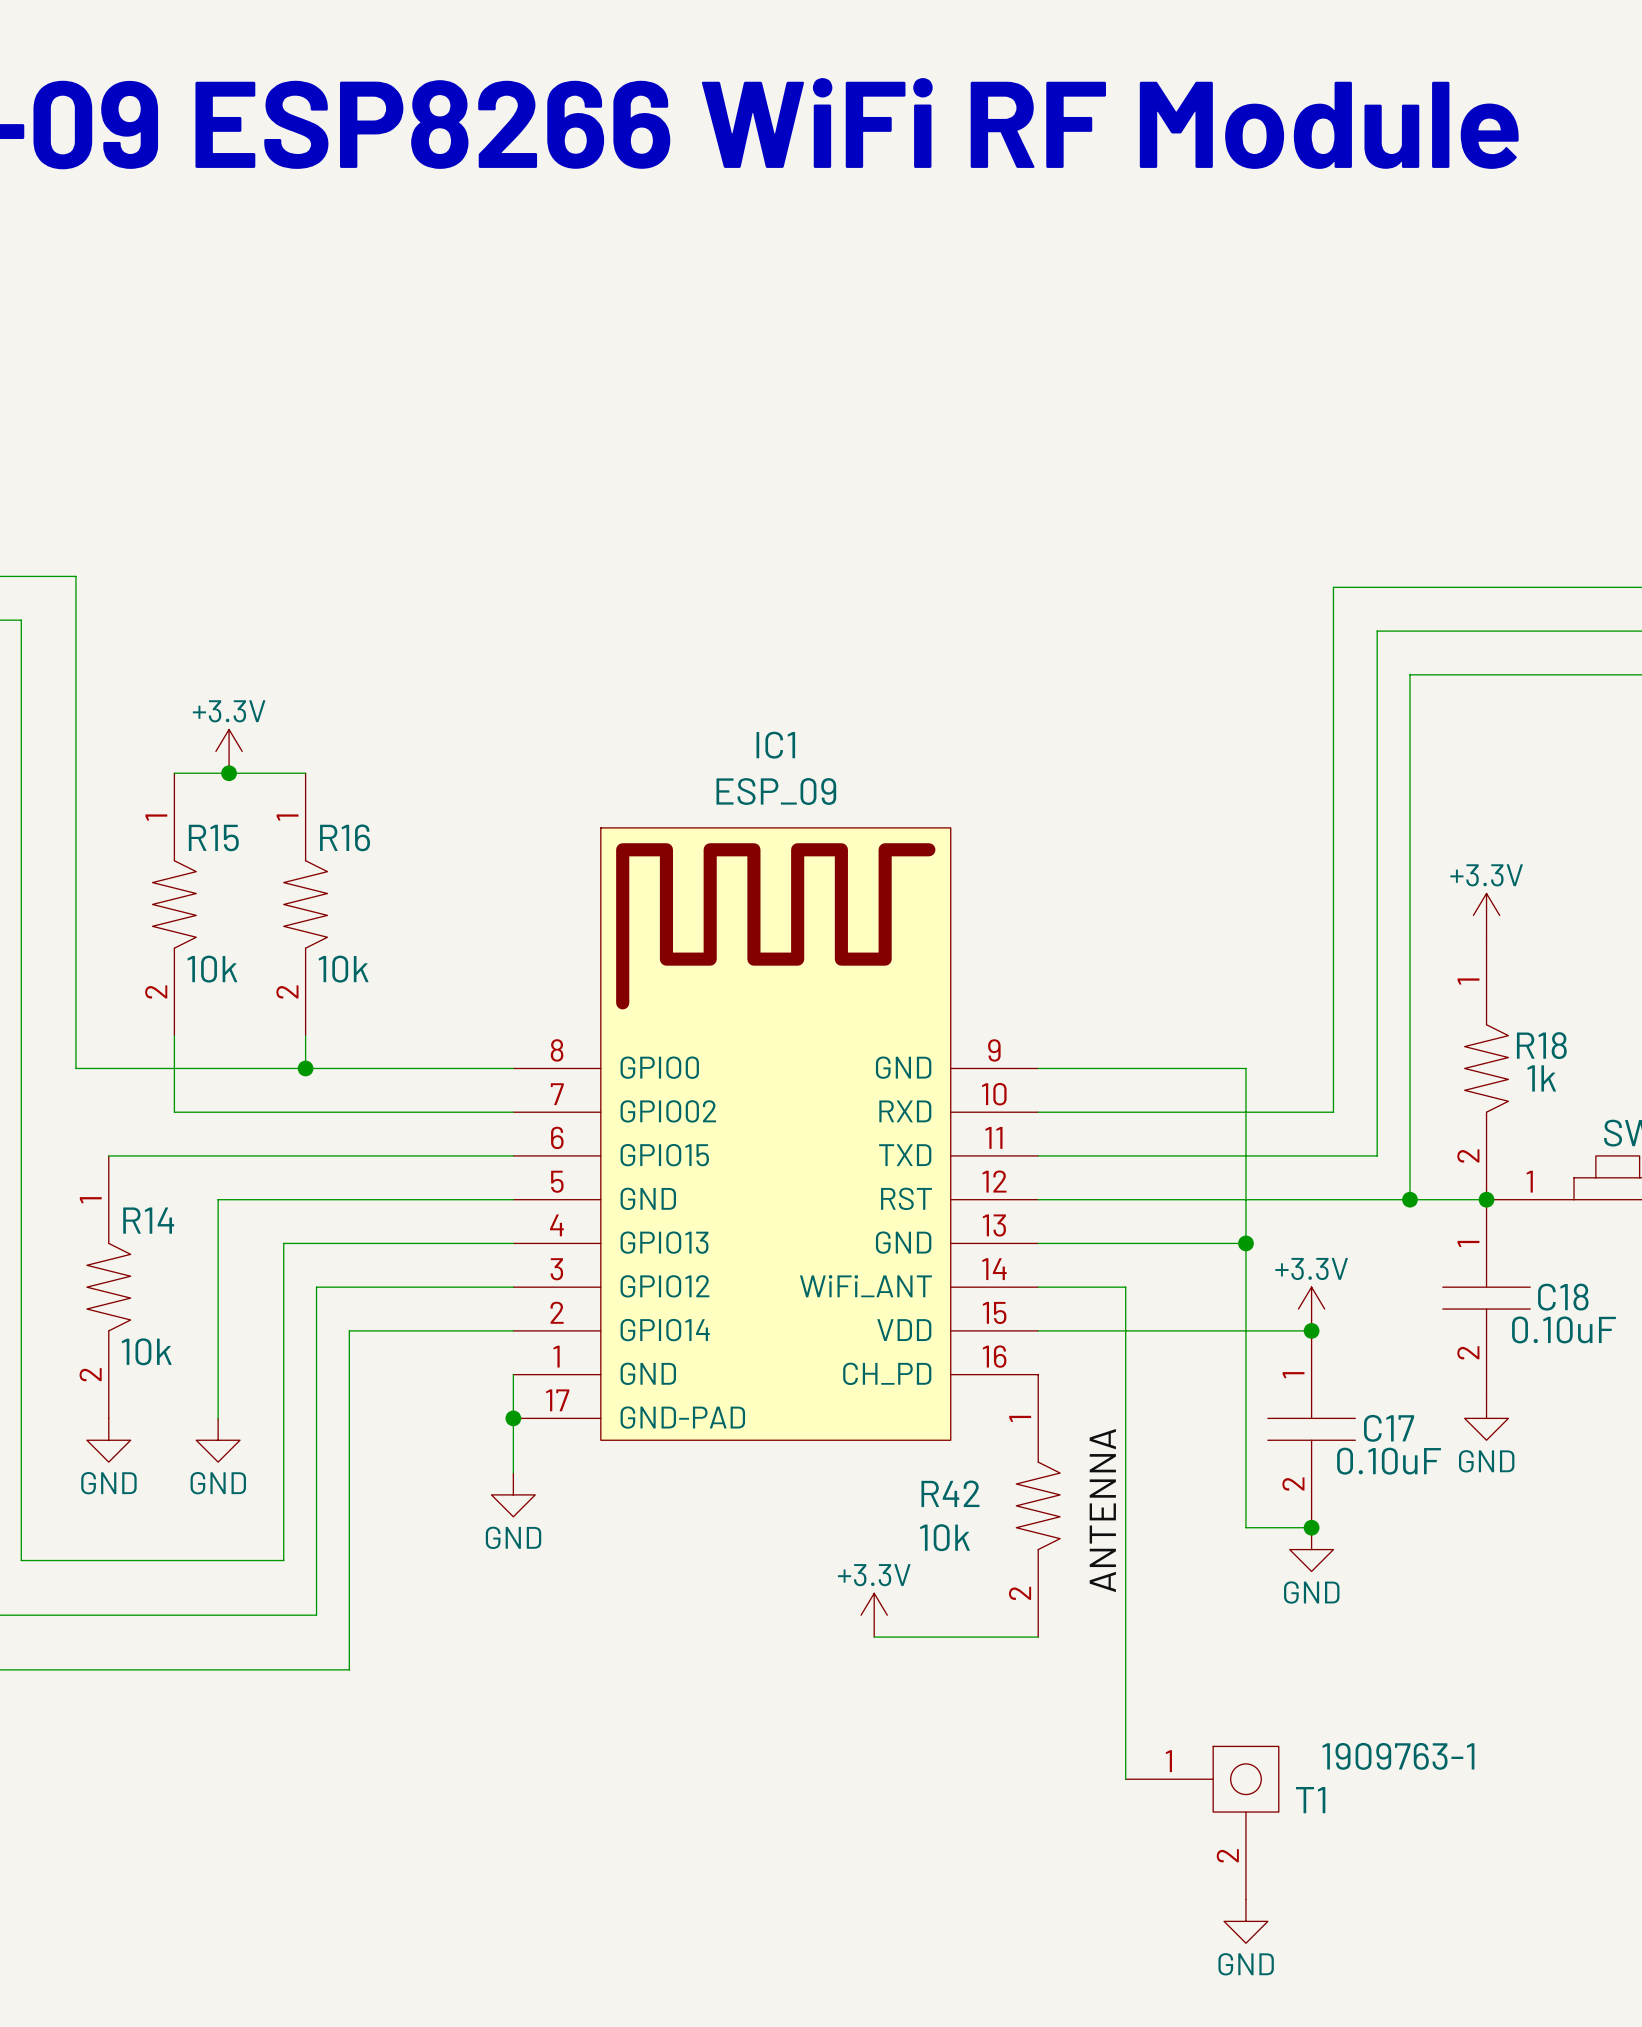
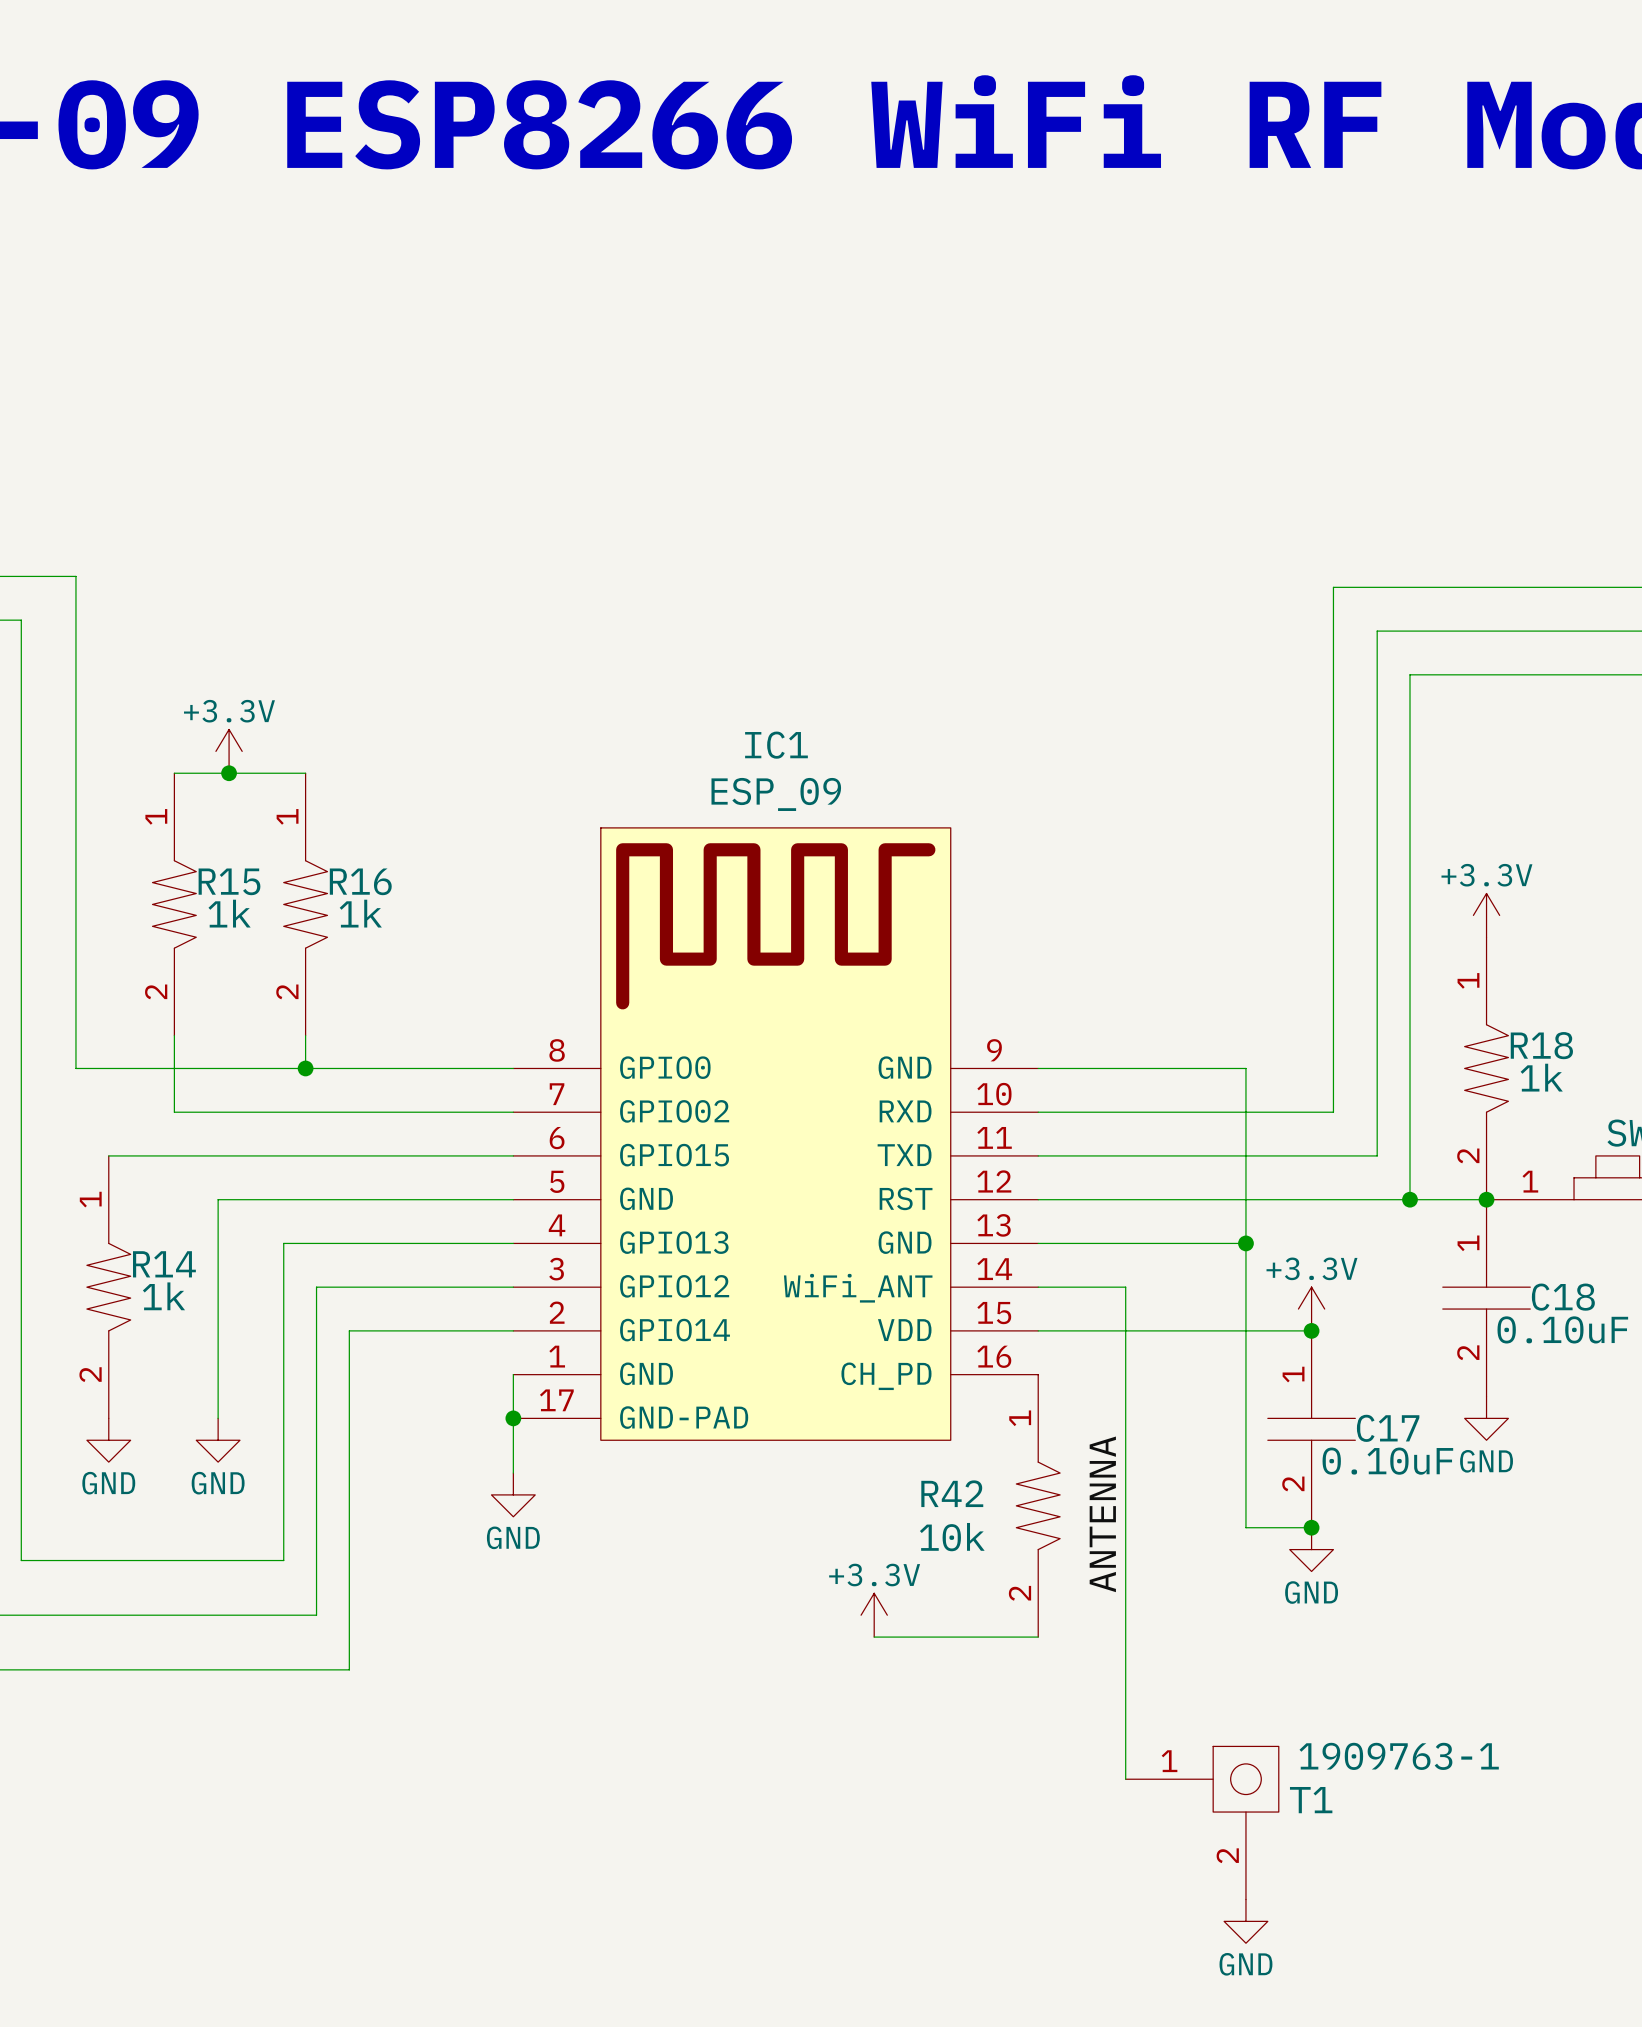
R16 name position: R16 (345, 837) -> R16 (360, 881)
R15 name position: R15 (213, 838) -> R15 (229, 881)
R15 text: 10k (212, 969) -> 1k (229, 913)
R16 text: 10k (343, 969) -> 1k (360, 913)
R14 name position: R14 (148, 1220) -> R14 (164, 1264)
R14 text: 10k (146, 1351) -> 1k (163, 1296)

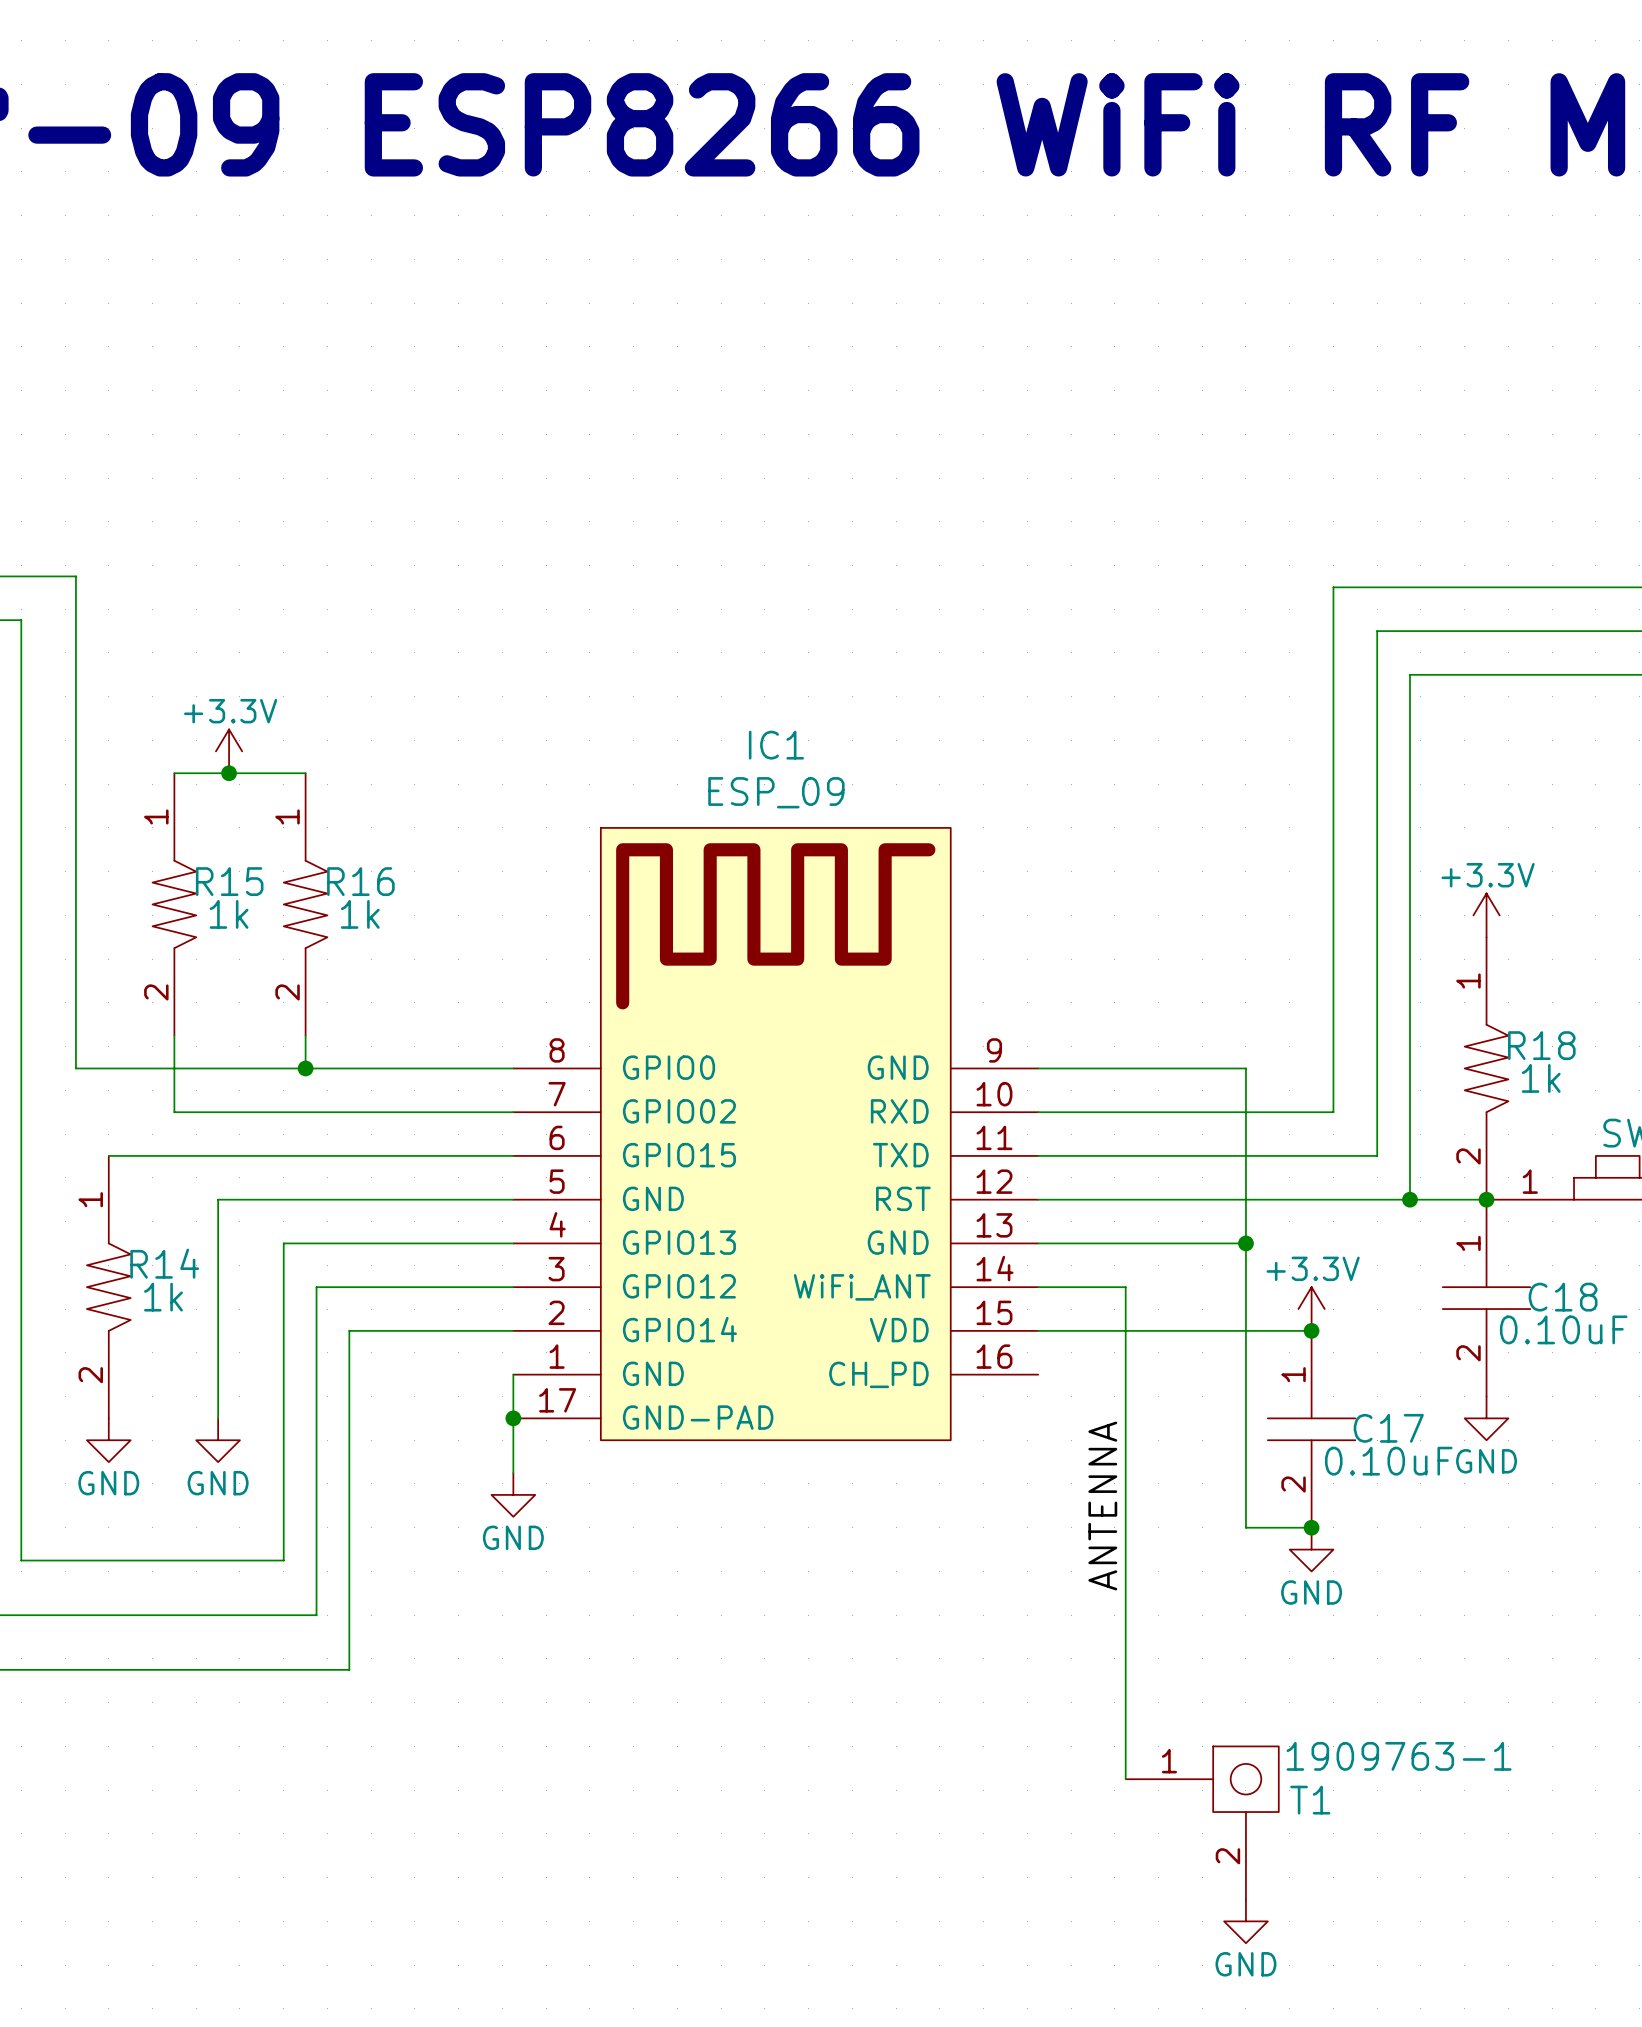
R42: (1038, 1505) -> none
power symbol: +3.3V (874, 1615) -> none
wire: (874, 1637) (1038, 1637) -> none

